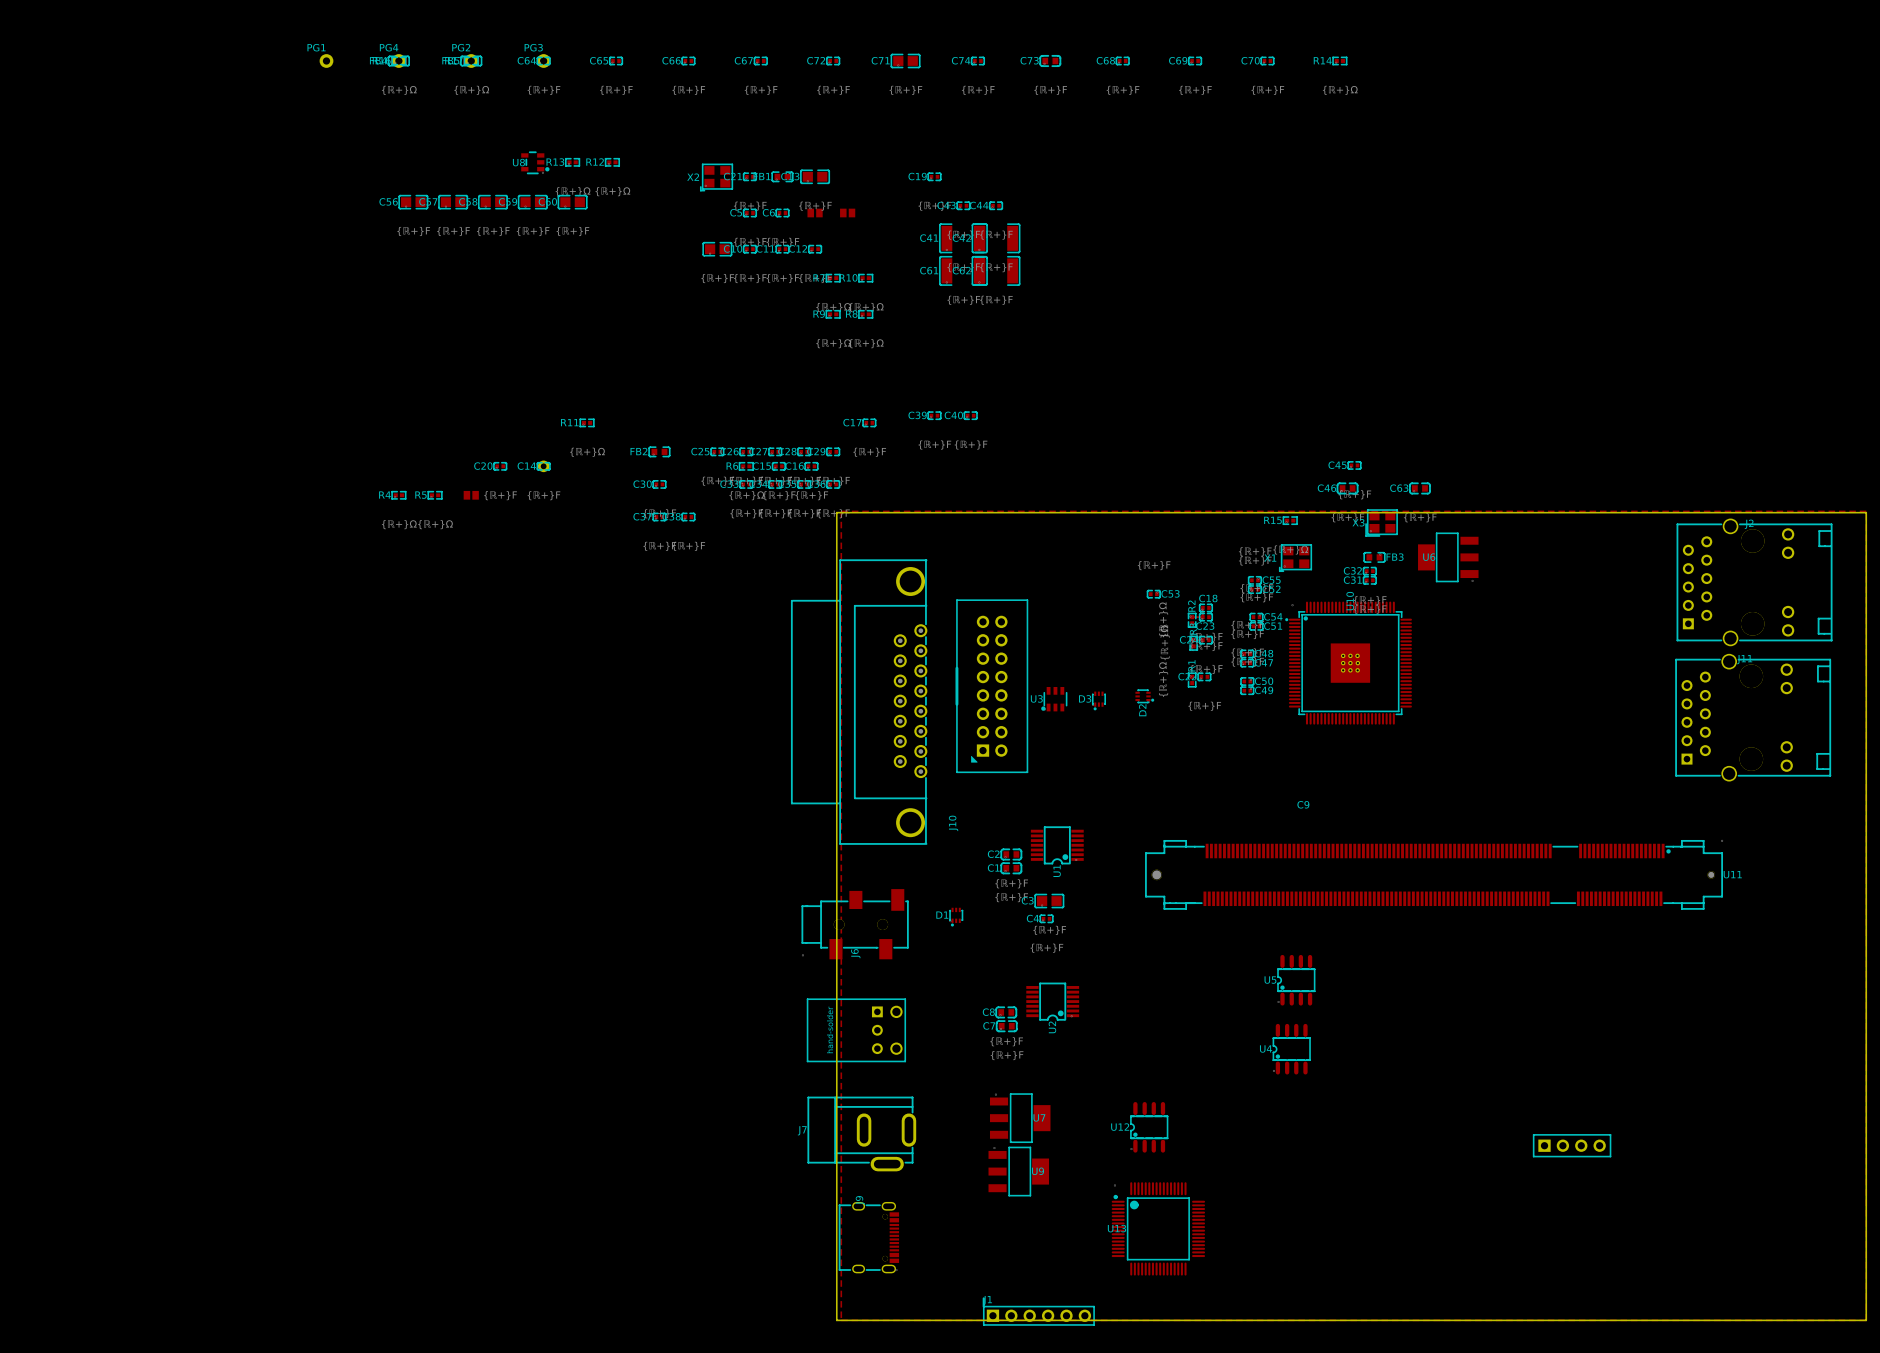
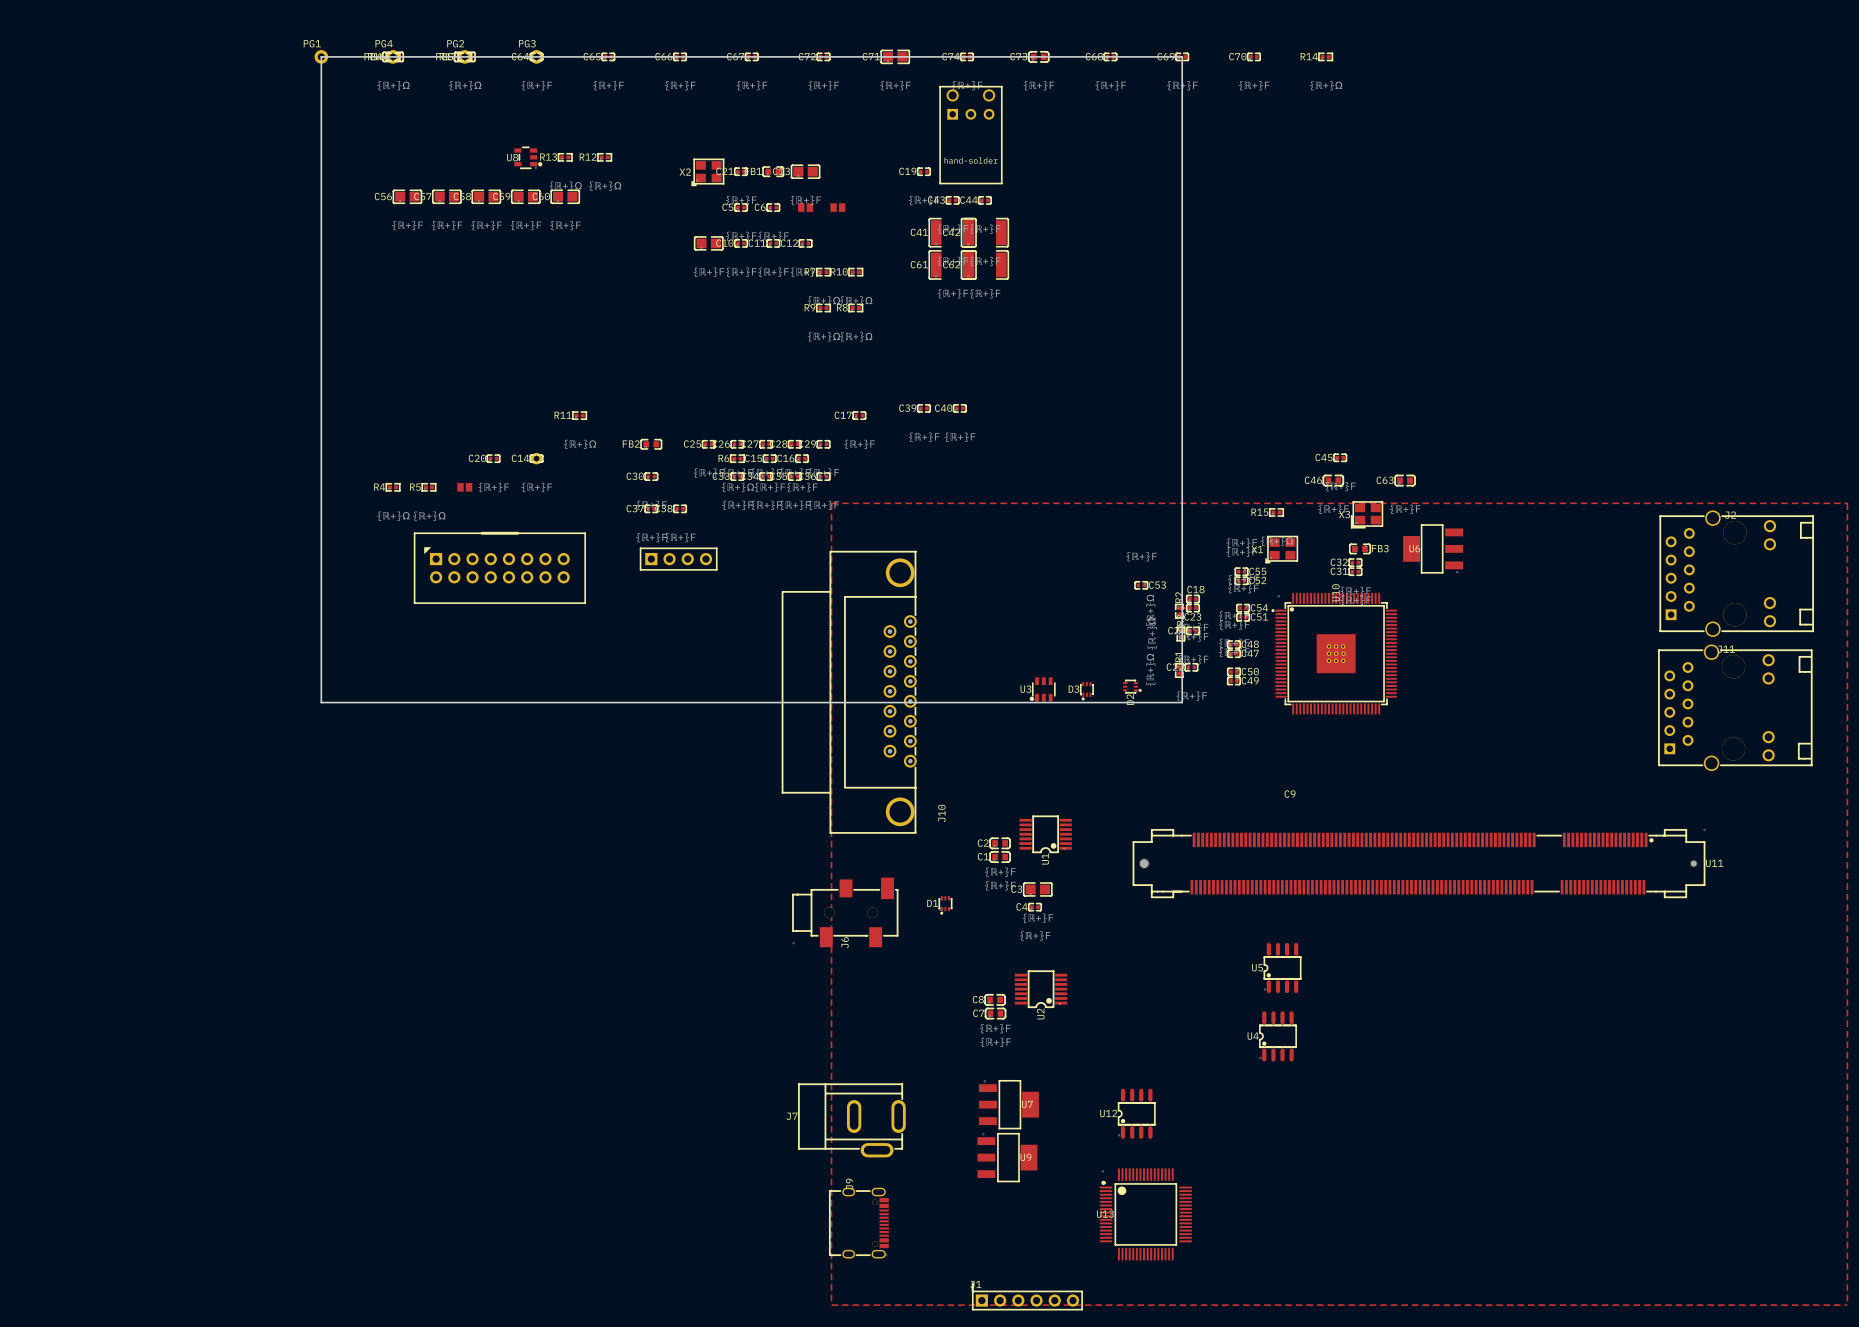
board edge: none -> (321, 56) (1182, 56) (1182, 702) (321, 702) (321, 56)
part: none -> (970, 135)
board edge: (836, 512) (1866, 512) (1866, 1320) (836, 1320) (836, 512) -> none
part: none -> (678, 559)
part: none -> (499, 567)
part: (991, 686) -> none
part: (856, 1030) -> none
part: (1572, 1145) -> none

